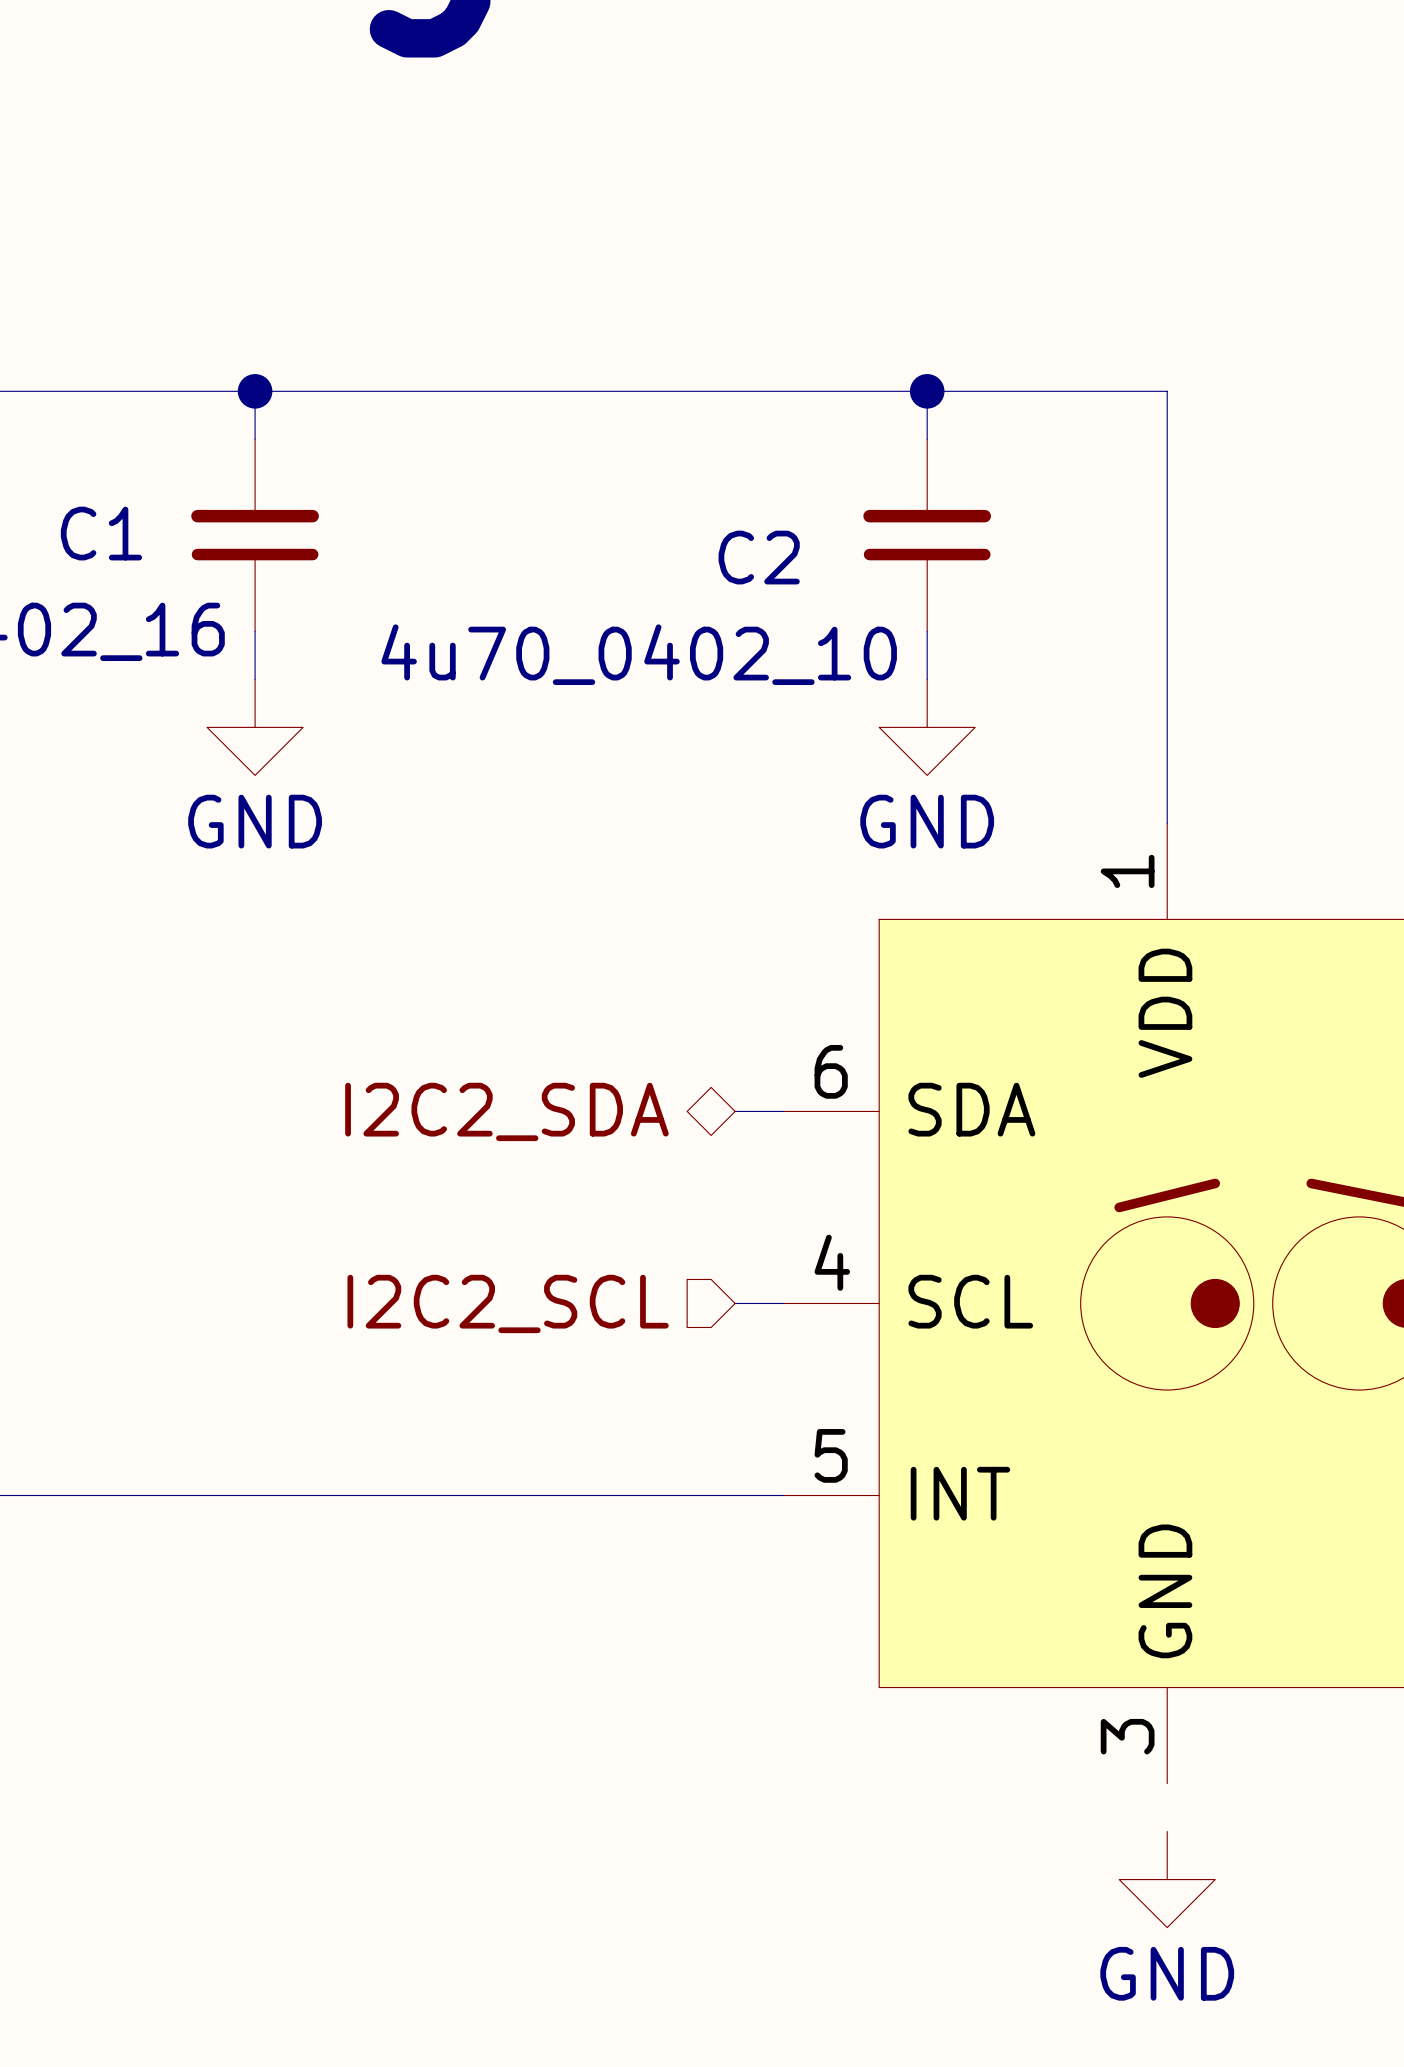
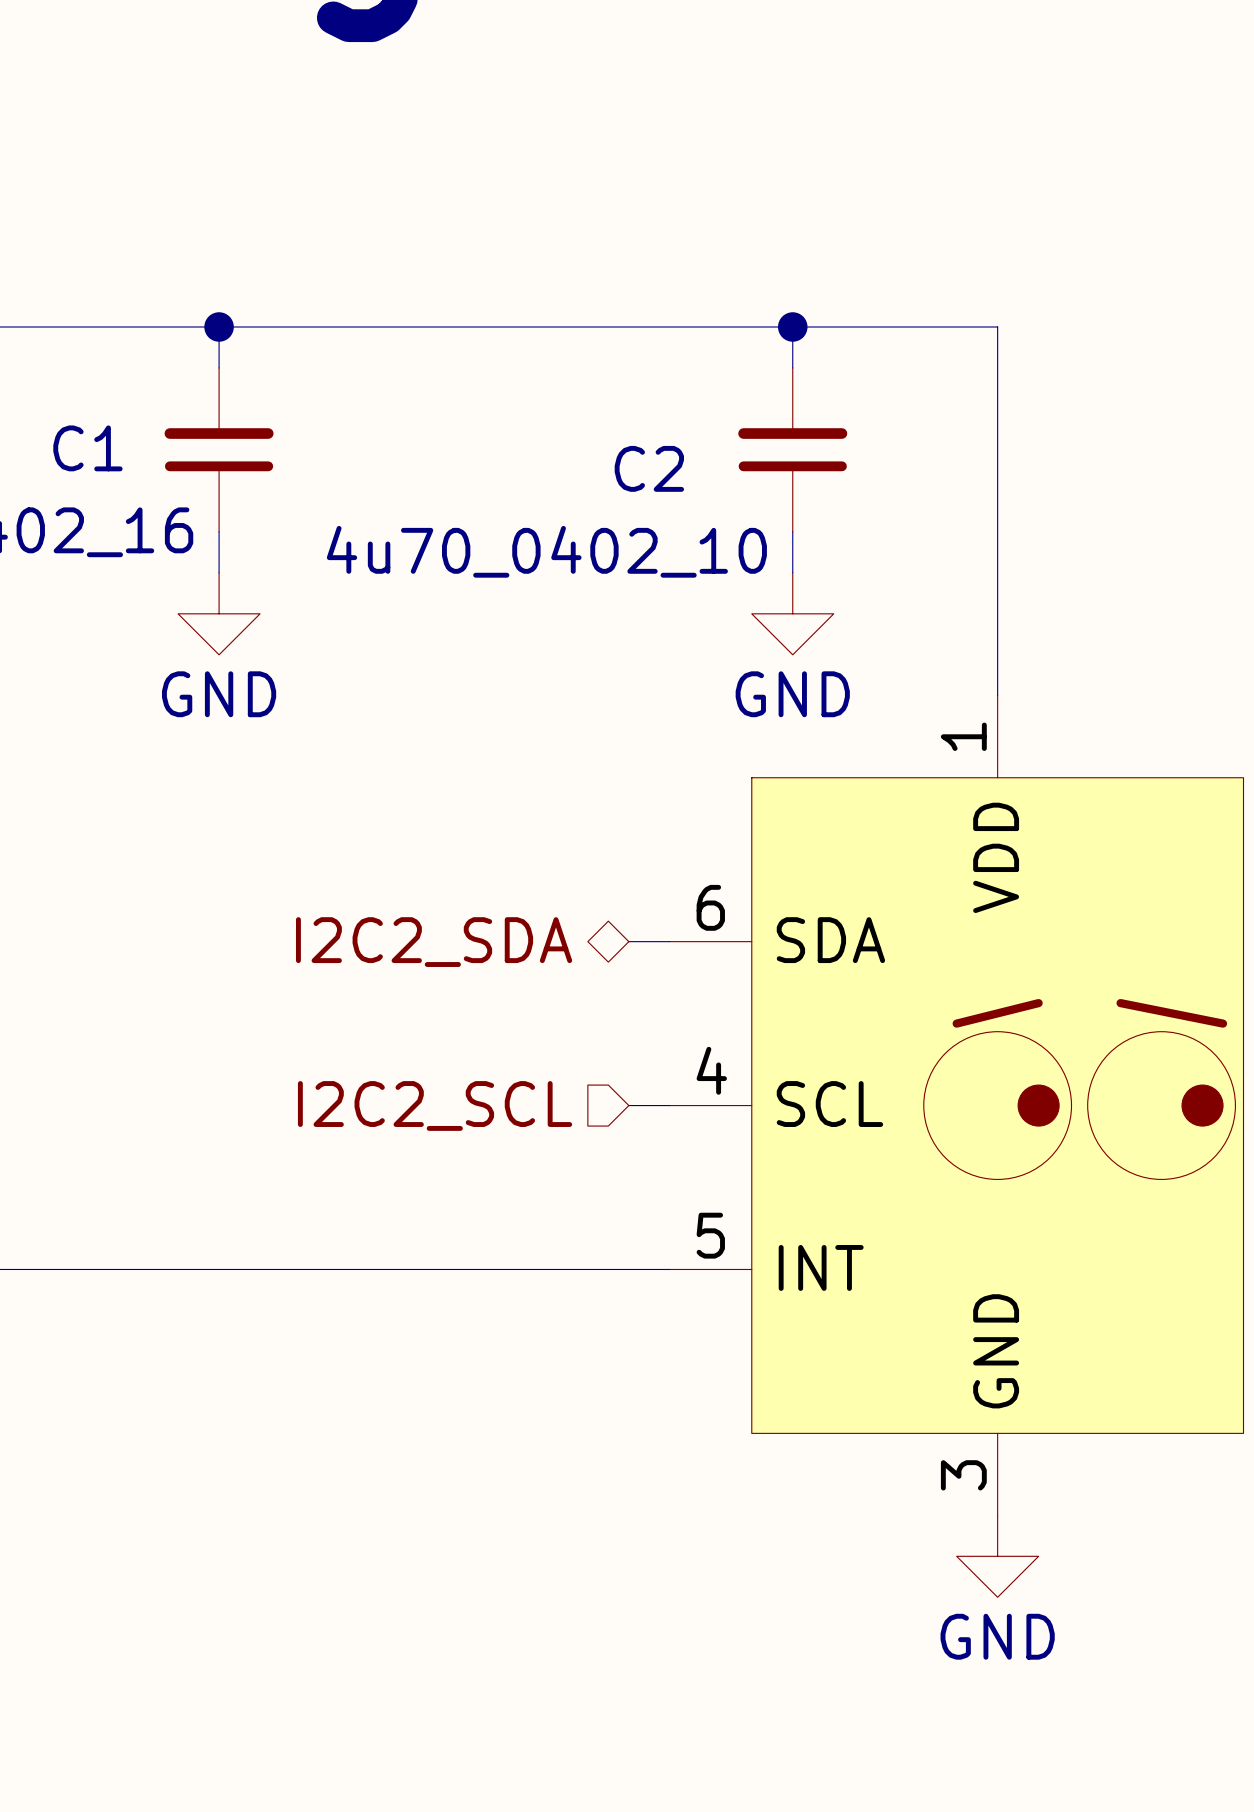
power symbol position: GND (1167, 1879) -> GND (997, 1556)

